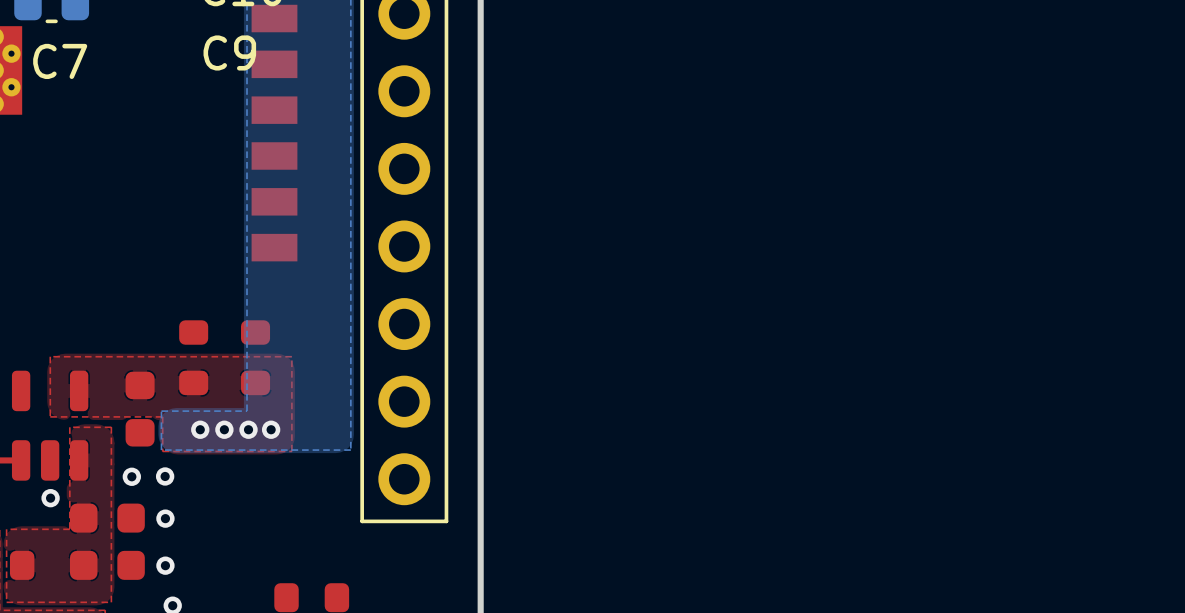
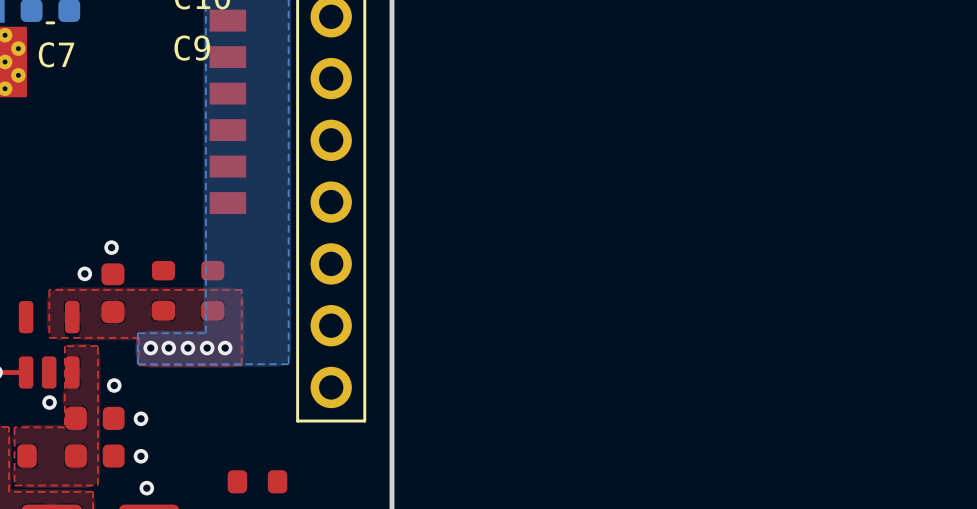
via: none -> (111, 247)
via: none -> (84, 273)
part position: (140, 409) -> (112, 293)
via position: (165, 476) -> (150, 348)

